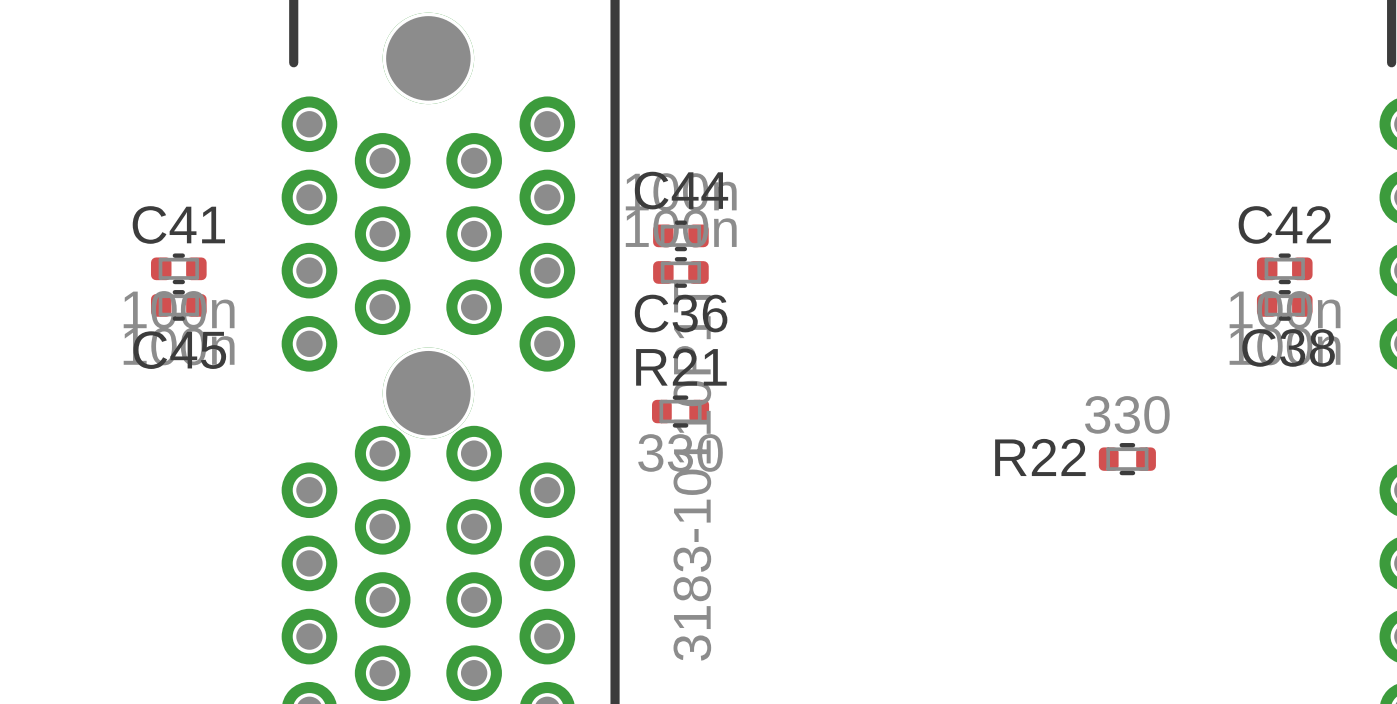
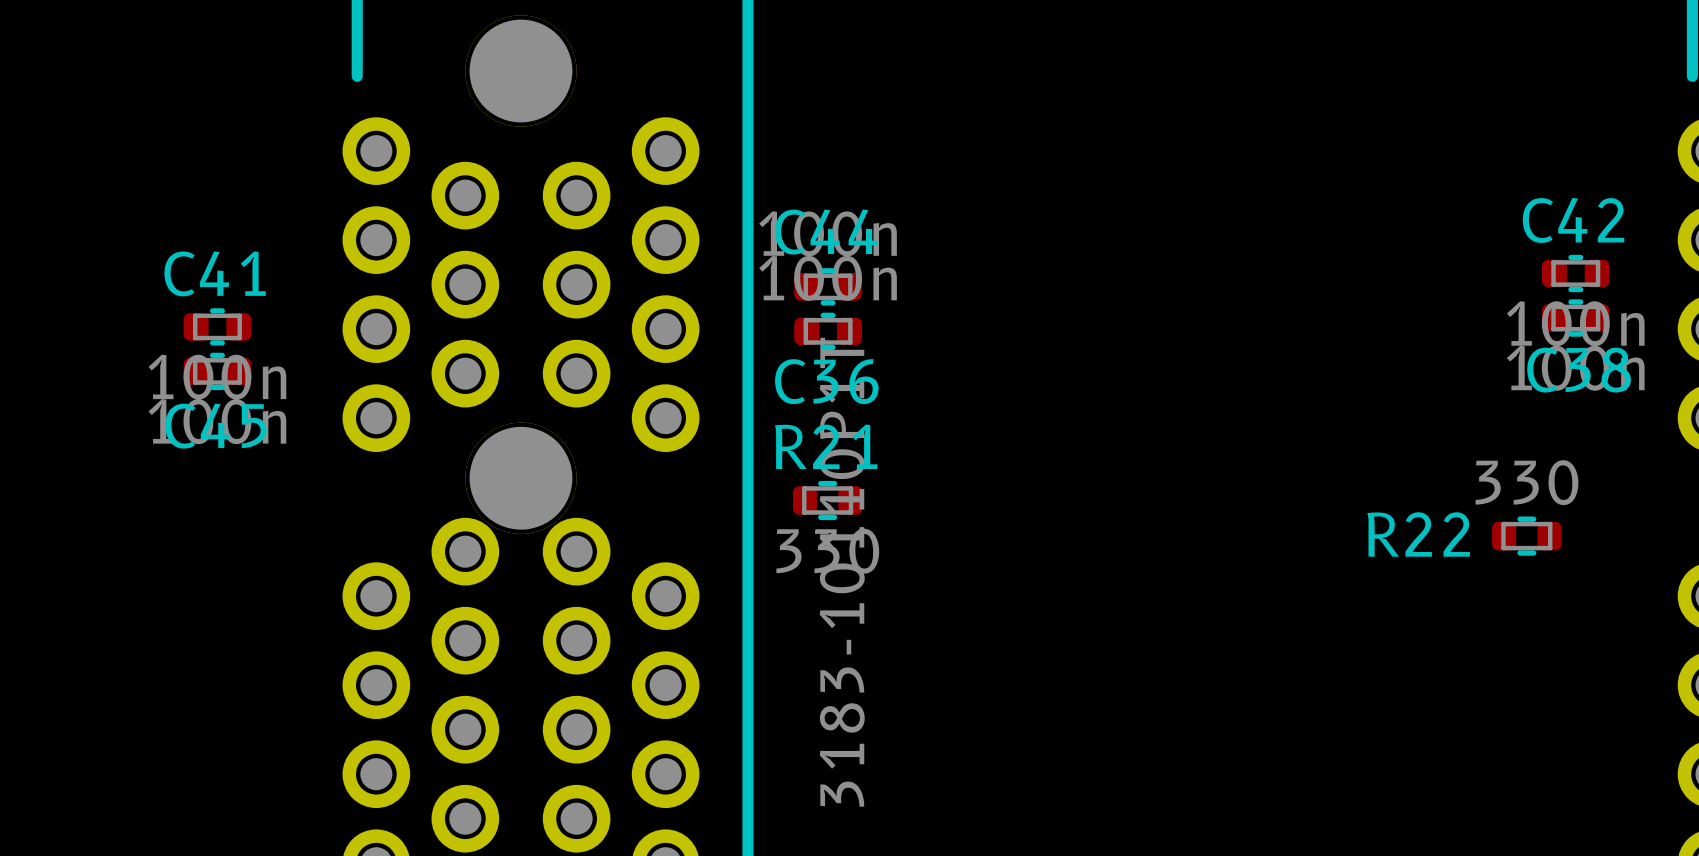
C42 position: (1284, 268) -> (1575, 273)
C38 position: (1284, 305) -> (1575, 318)
R22 position: (1127, 459) -> (1526, 536)

